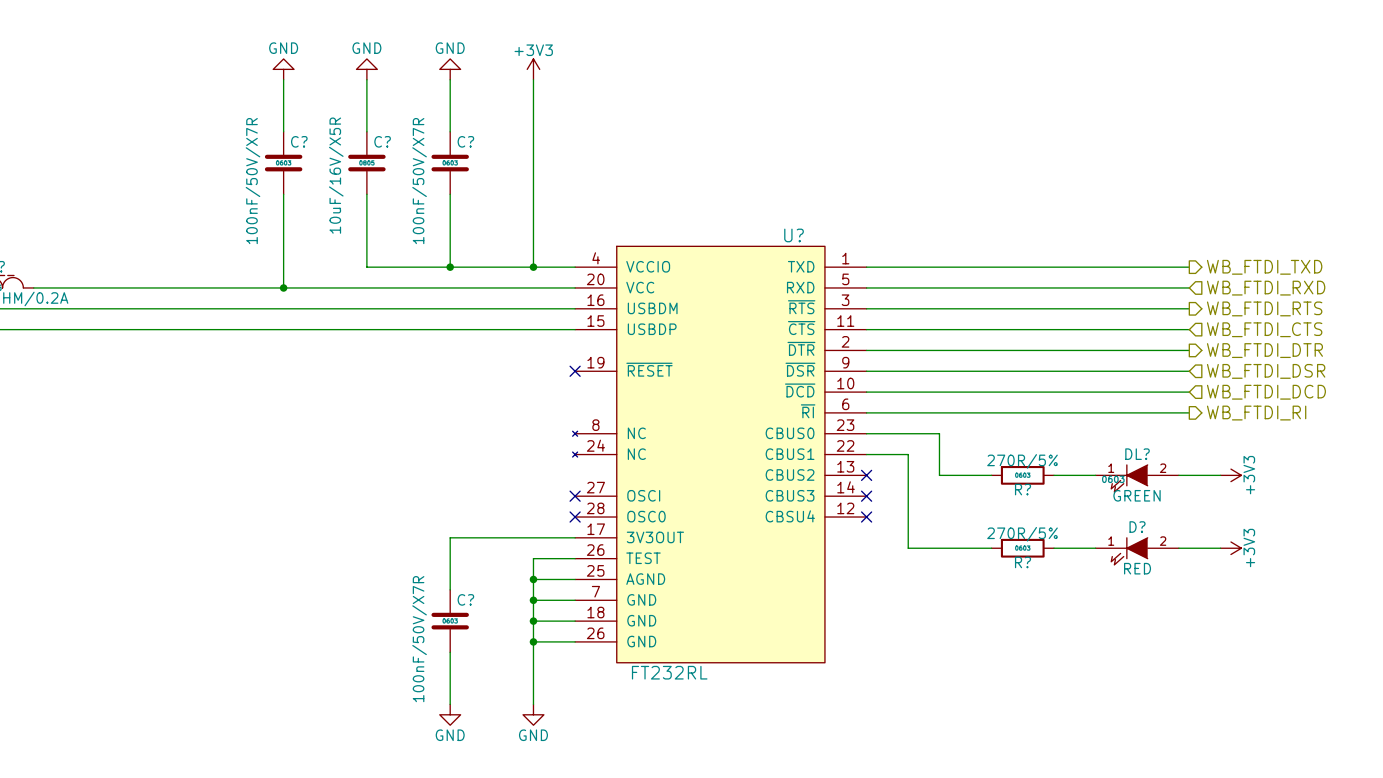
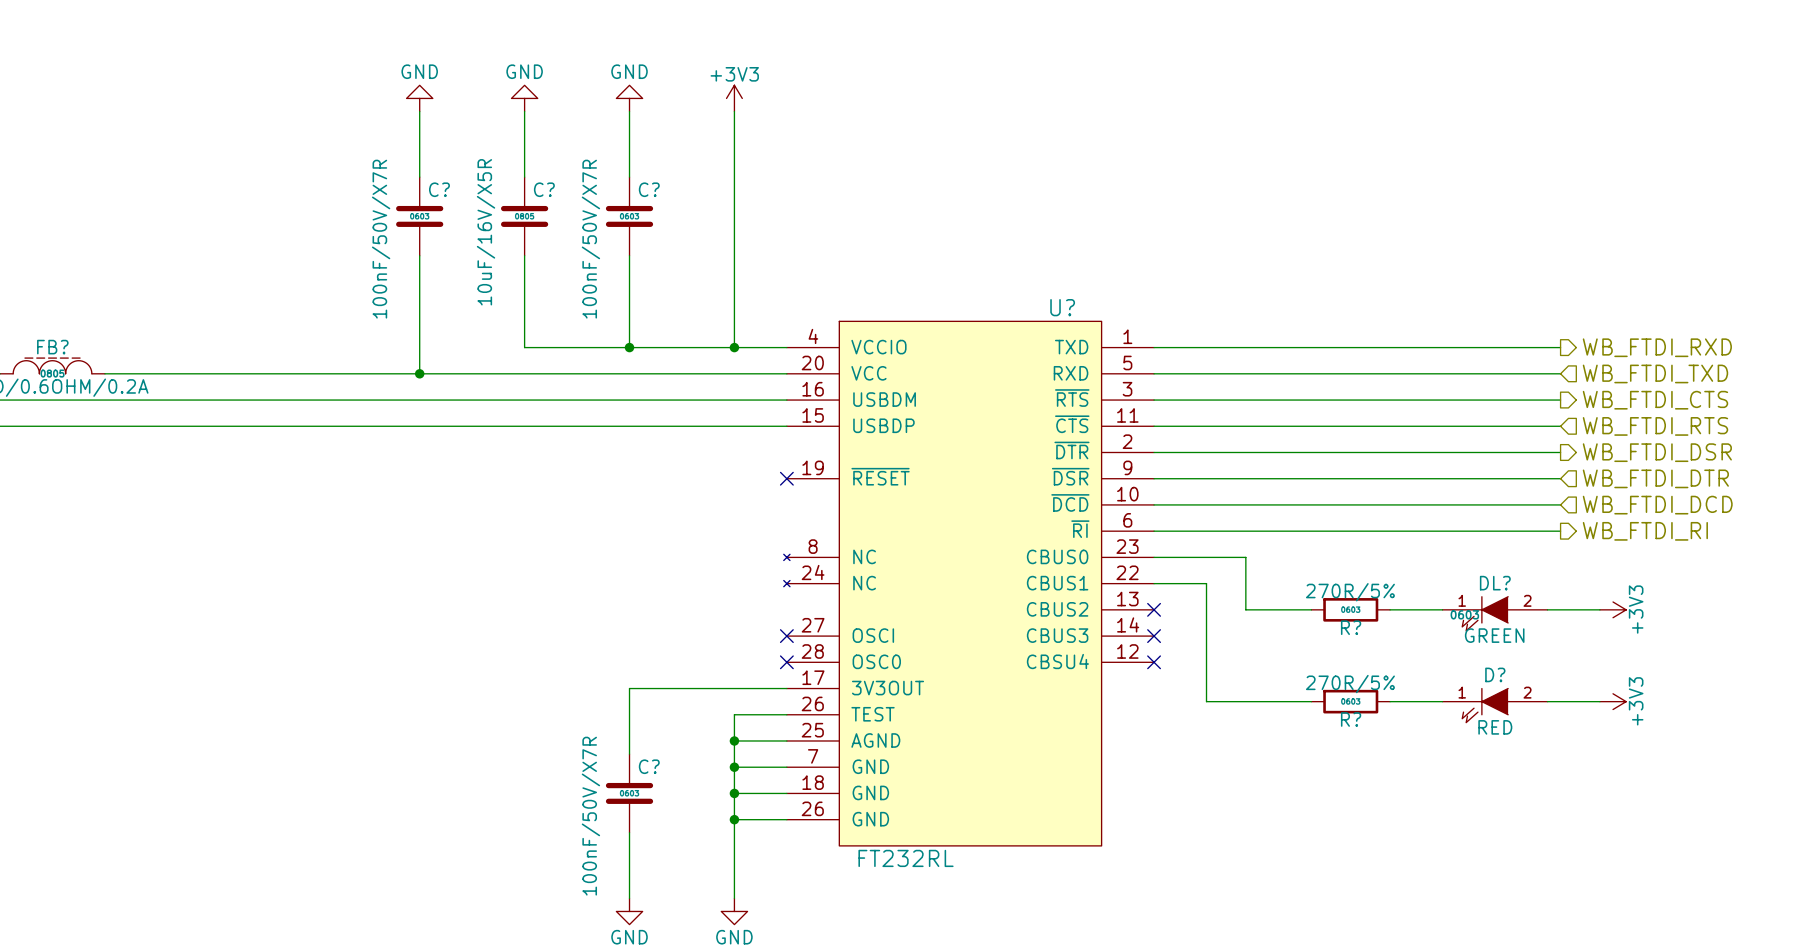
hierarchical label: WB_FTDI_TXD (1264, 267) -> WB_FTDI_RXD (1657, 347)
hierarchical label: WB_FTDI_RXD (1266, 288) -> WB_FTDI_TXD (1655, 373)
hierarchical label: WB_FTDI_RTS (1264, 308) -> WB_FTDI_CTS (1655, 400)
hierarchical label: WB_FTDI_CTS (1264, 329) -> WB_FTDI_RTS (1655, 426)
hierarchical label: WB_FTDI_DTR (1264, 350) -> WB_FTDI_DSR (1657, 452)
hierarchical label: WB_FTDI_DSR (1266, 371) -> WB_FTDI_DTR (1655, 478)

